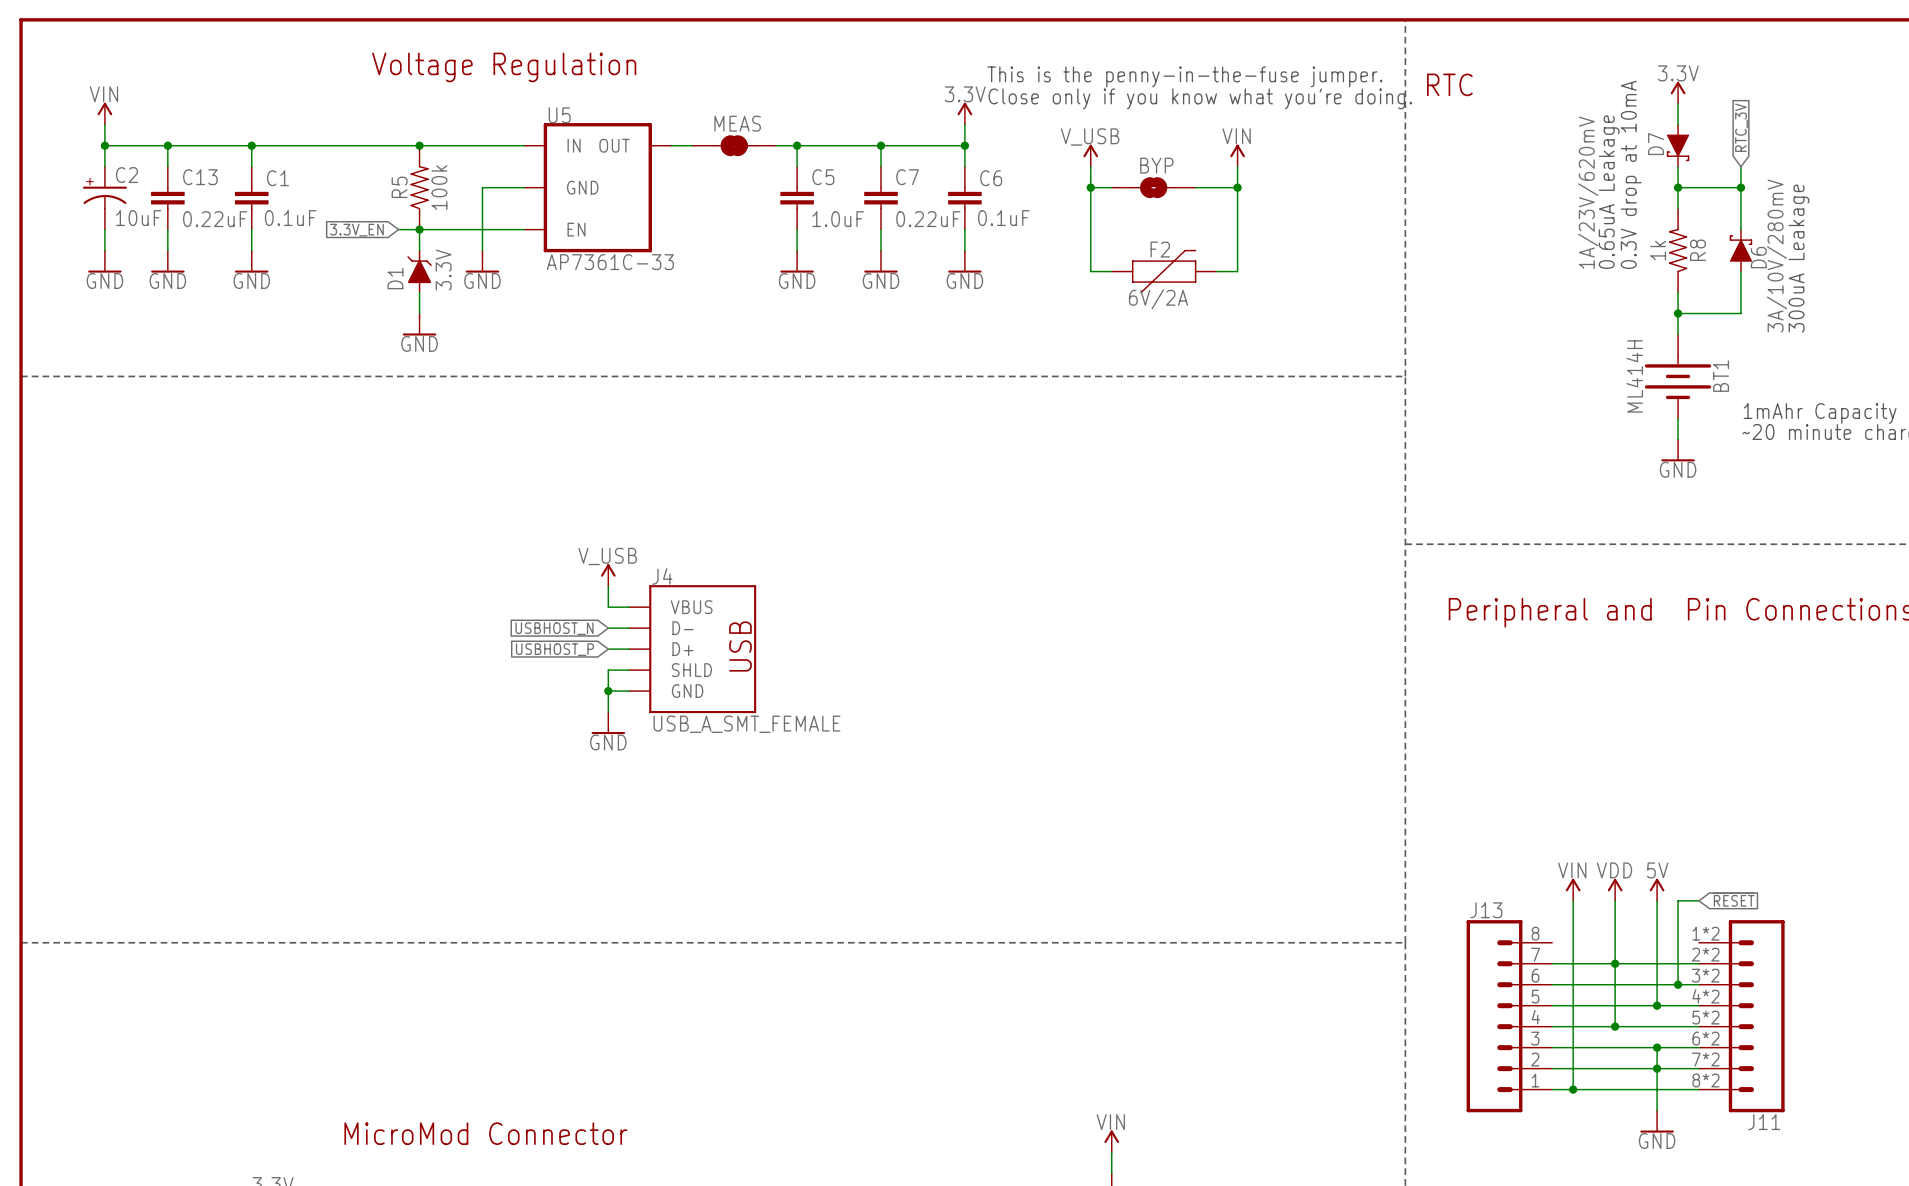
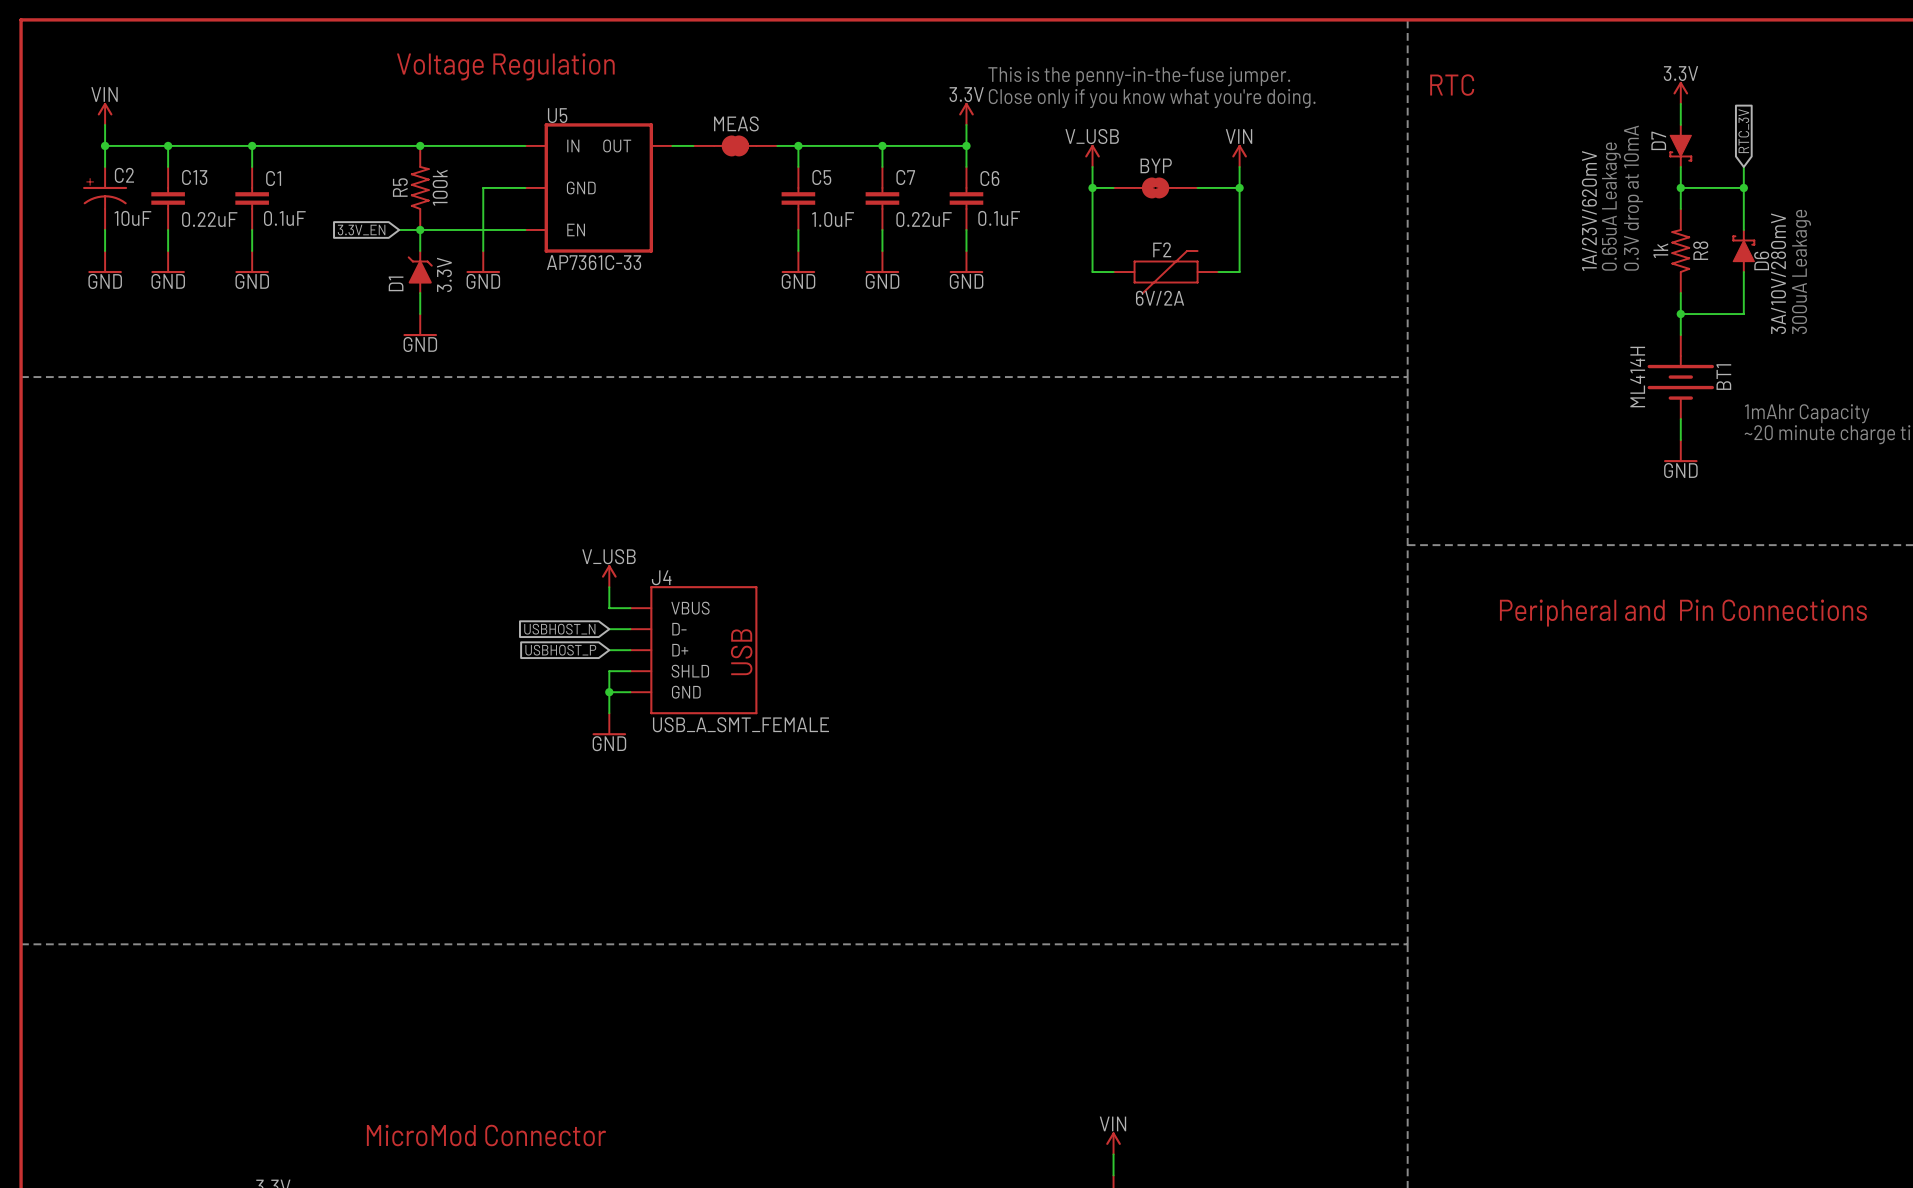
power symbol: VIN (1573, 889) -> none
power symbol: VDD (1615, 889) -> none
power symbol: 5V (1657, 889) -> none
global label: ~{RESET} (1733, 899) -> none
wire: (1573, 900) (1573, 1089) -> none
wire: (1615, 900) (1615, 1026) -> none
wire: (1657, 900) (1657, 1005) -> none
wire: (1699, 900) (1678, 900) (1678, 984) -> none
wire: (1552, 963) (1699, 963) -> none
junction: (1615, 963) -> none
wire: (1552, 984) (1699, 984) -> none
junction: (1678, 984) -> none
wire: (1552, 1005) (1699, 1005) -> none
junction: (1657, 1005) -> none
J13: (1509, 1016) -> none
J11: (1741, 1016) -> none
wire: (1552, 1026) (1699, 1026) -> none
junction: (1615, 1026) -> none
wire: (1552, 1047) (1699, 1047) -> none
wire: (1657, 1047) (1657, 1110) -> none
junction: (1657, 1047) -> none
wire: (1552, 1068) (1699, 1068) -> none
junction: (1657, 1068) -> none
wire: (1552, 1089) (1699, 1089) -> none
junction: (1573, 1089) -> none
power symbol: GND (1657, 1121) -> none

